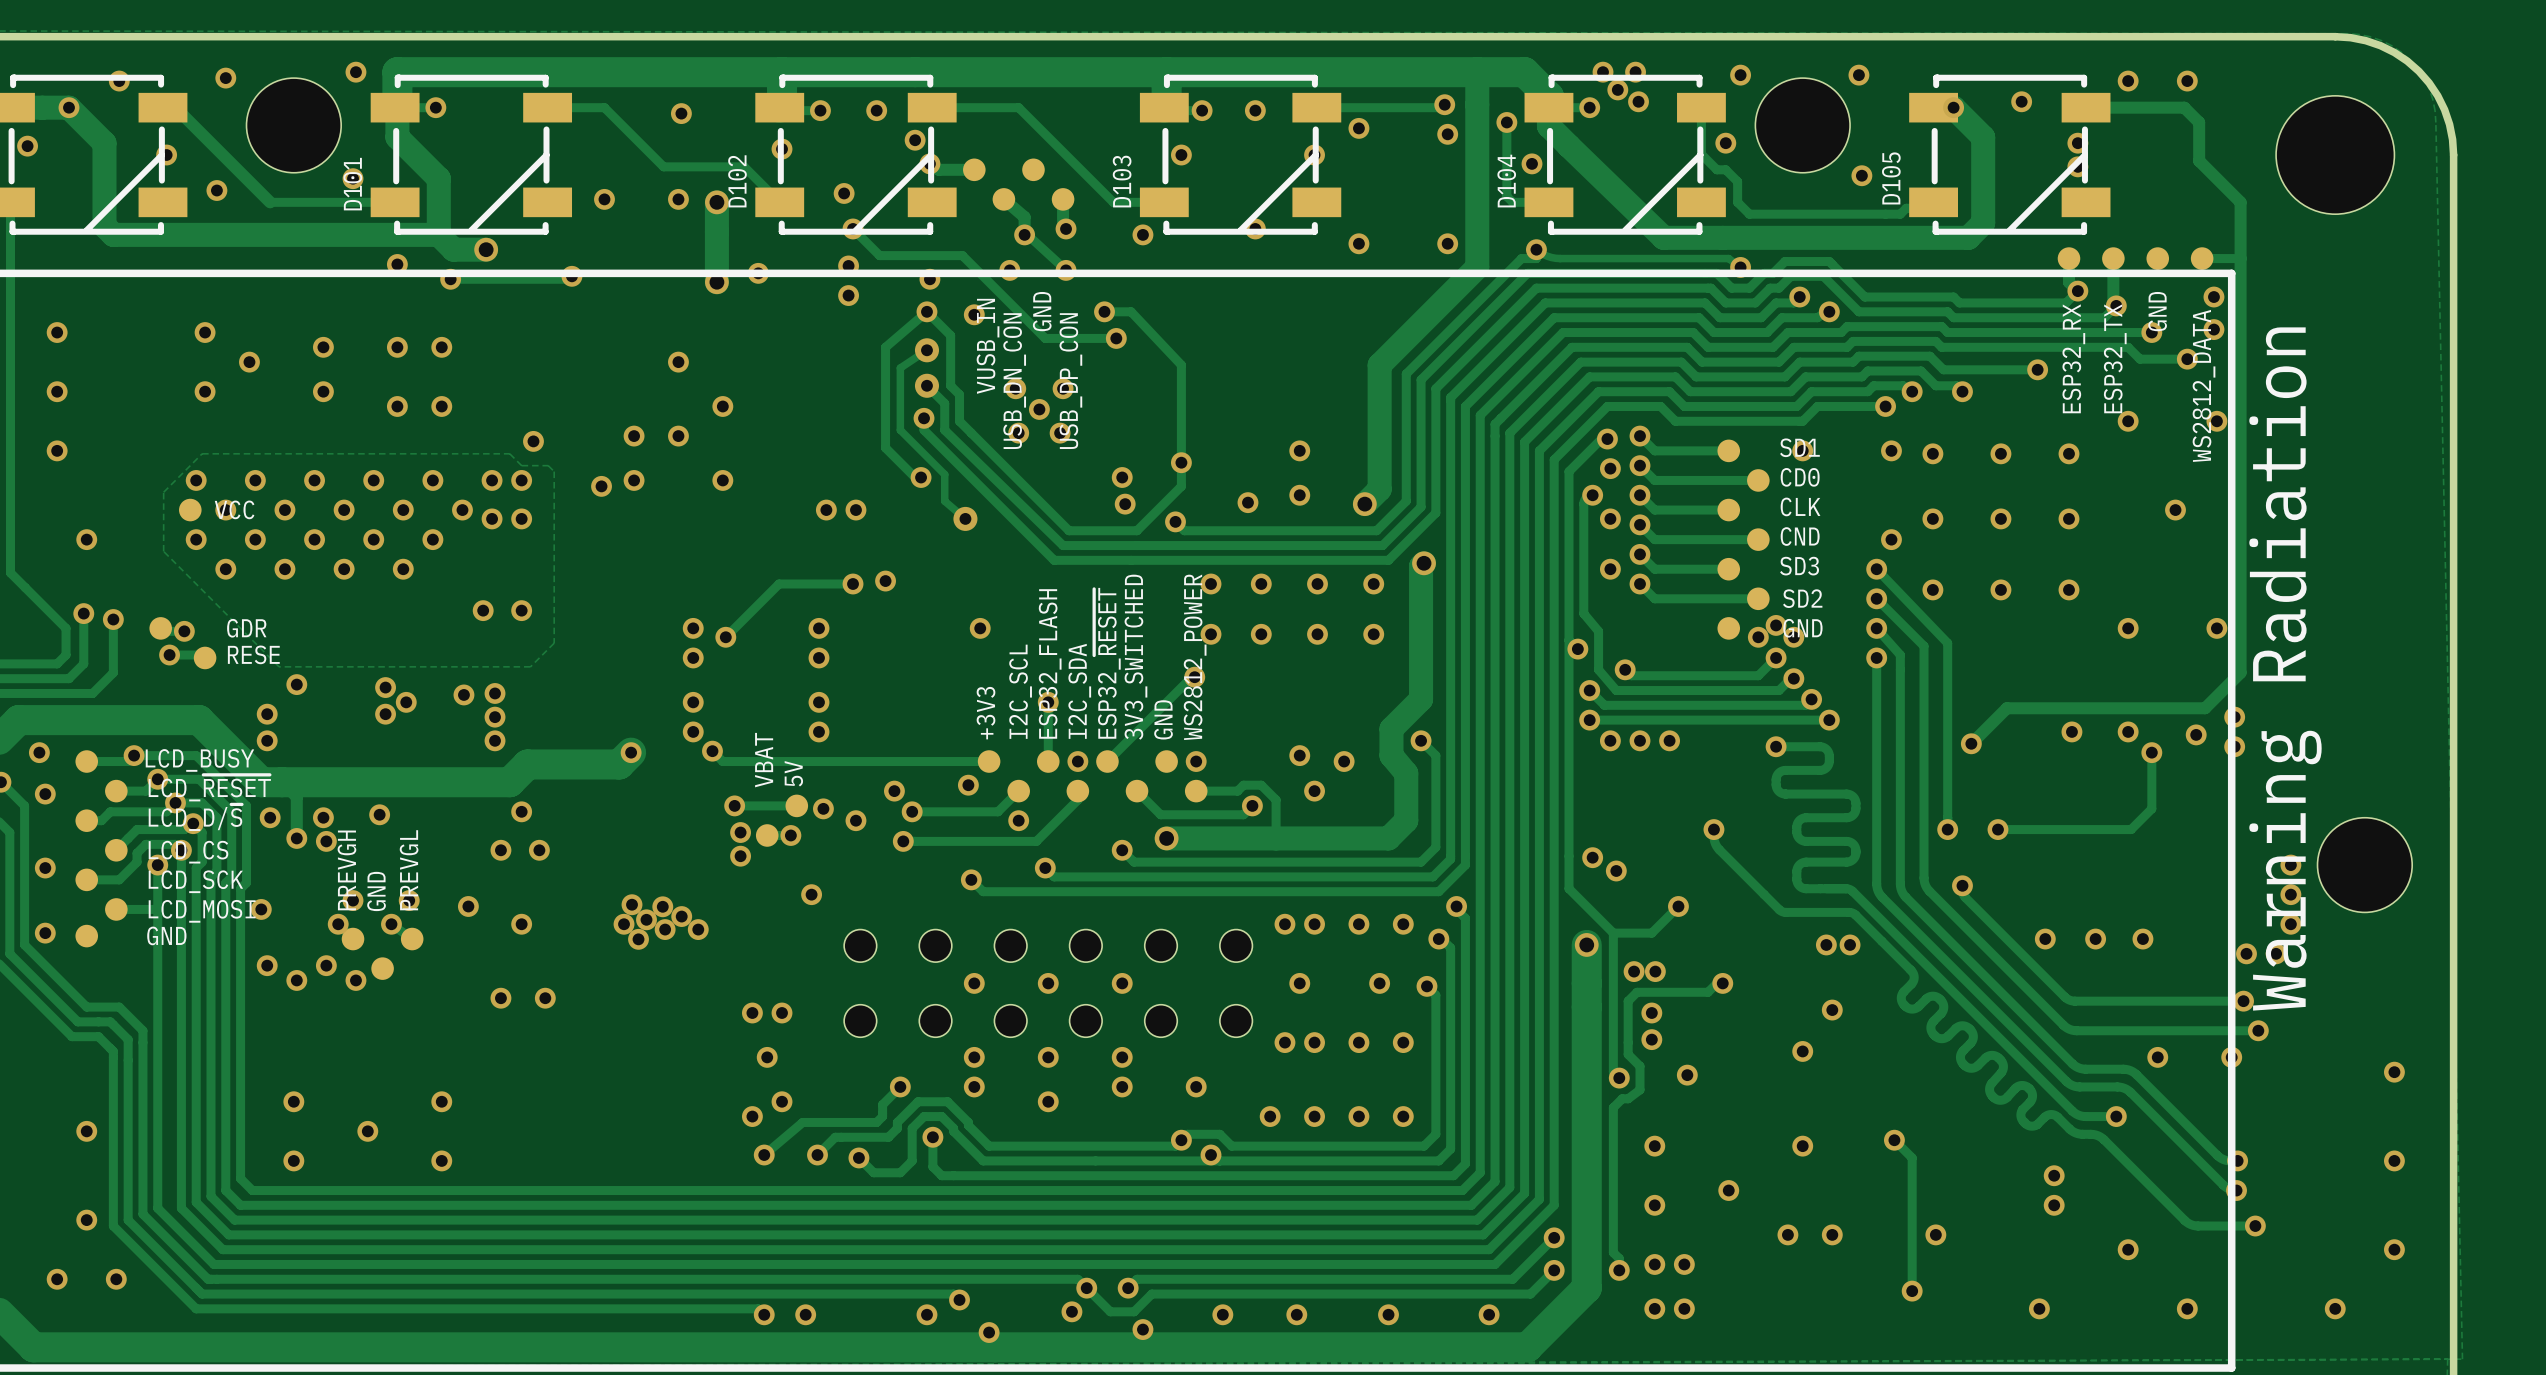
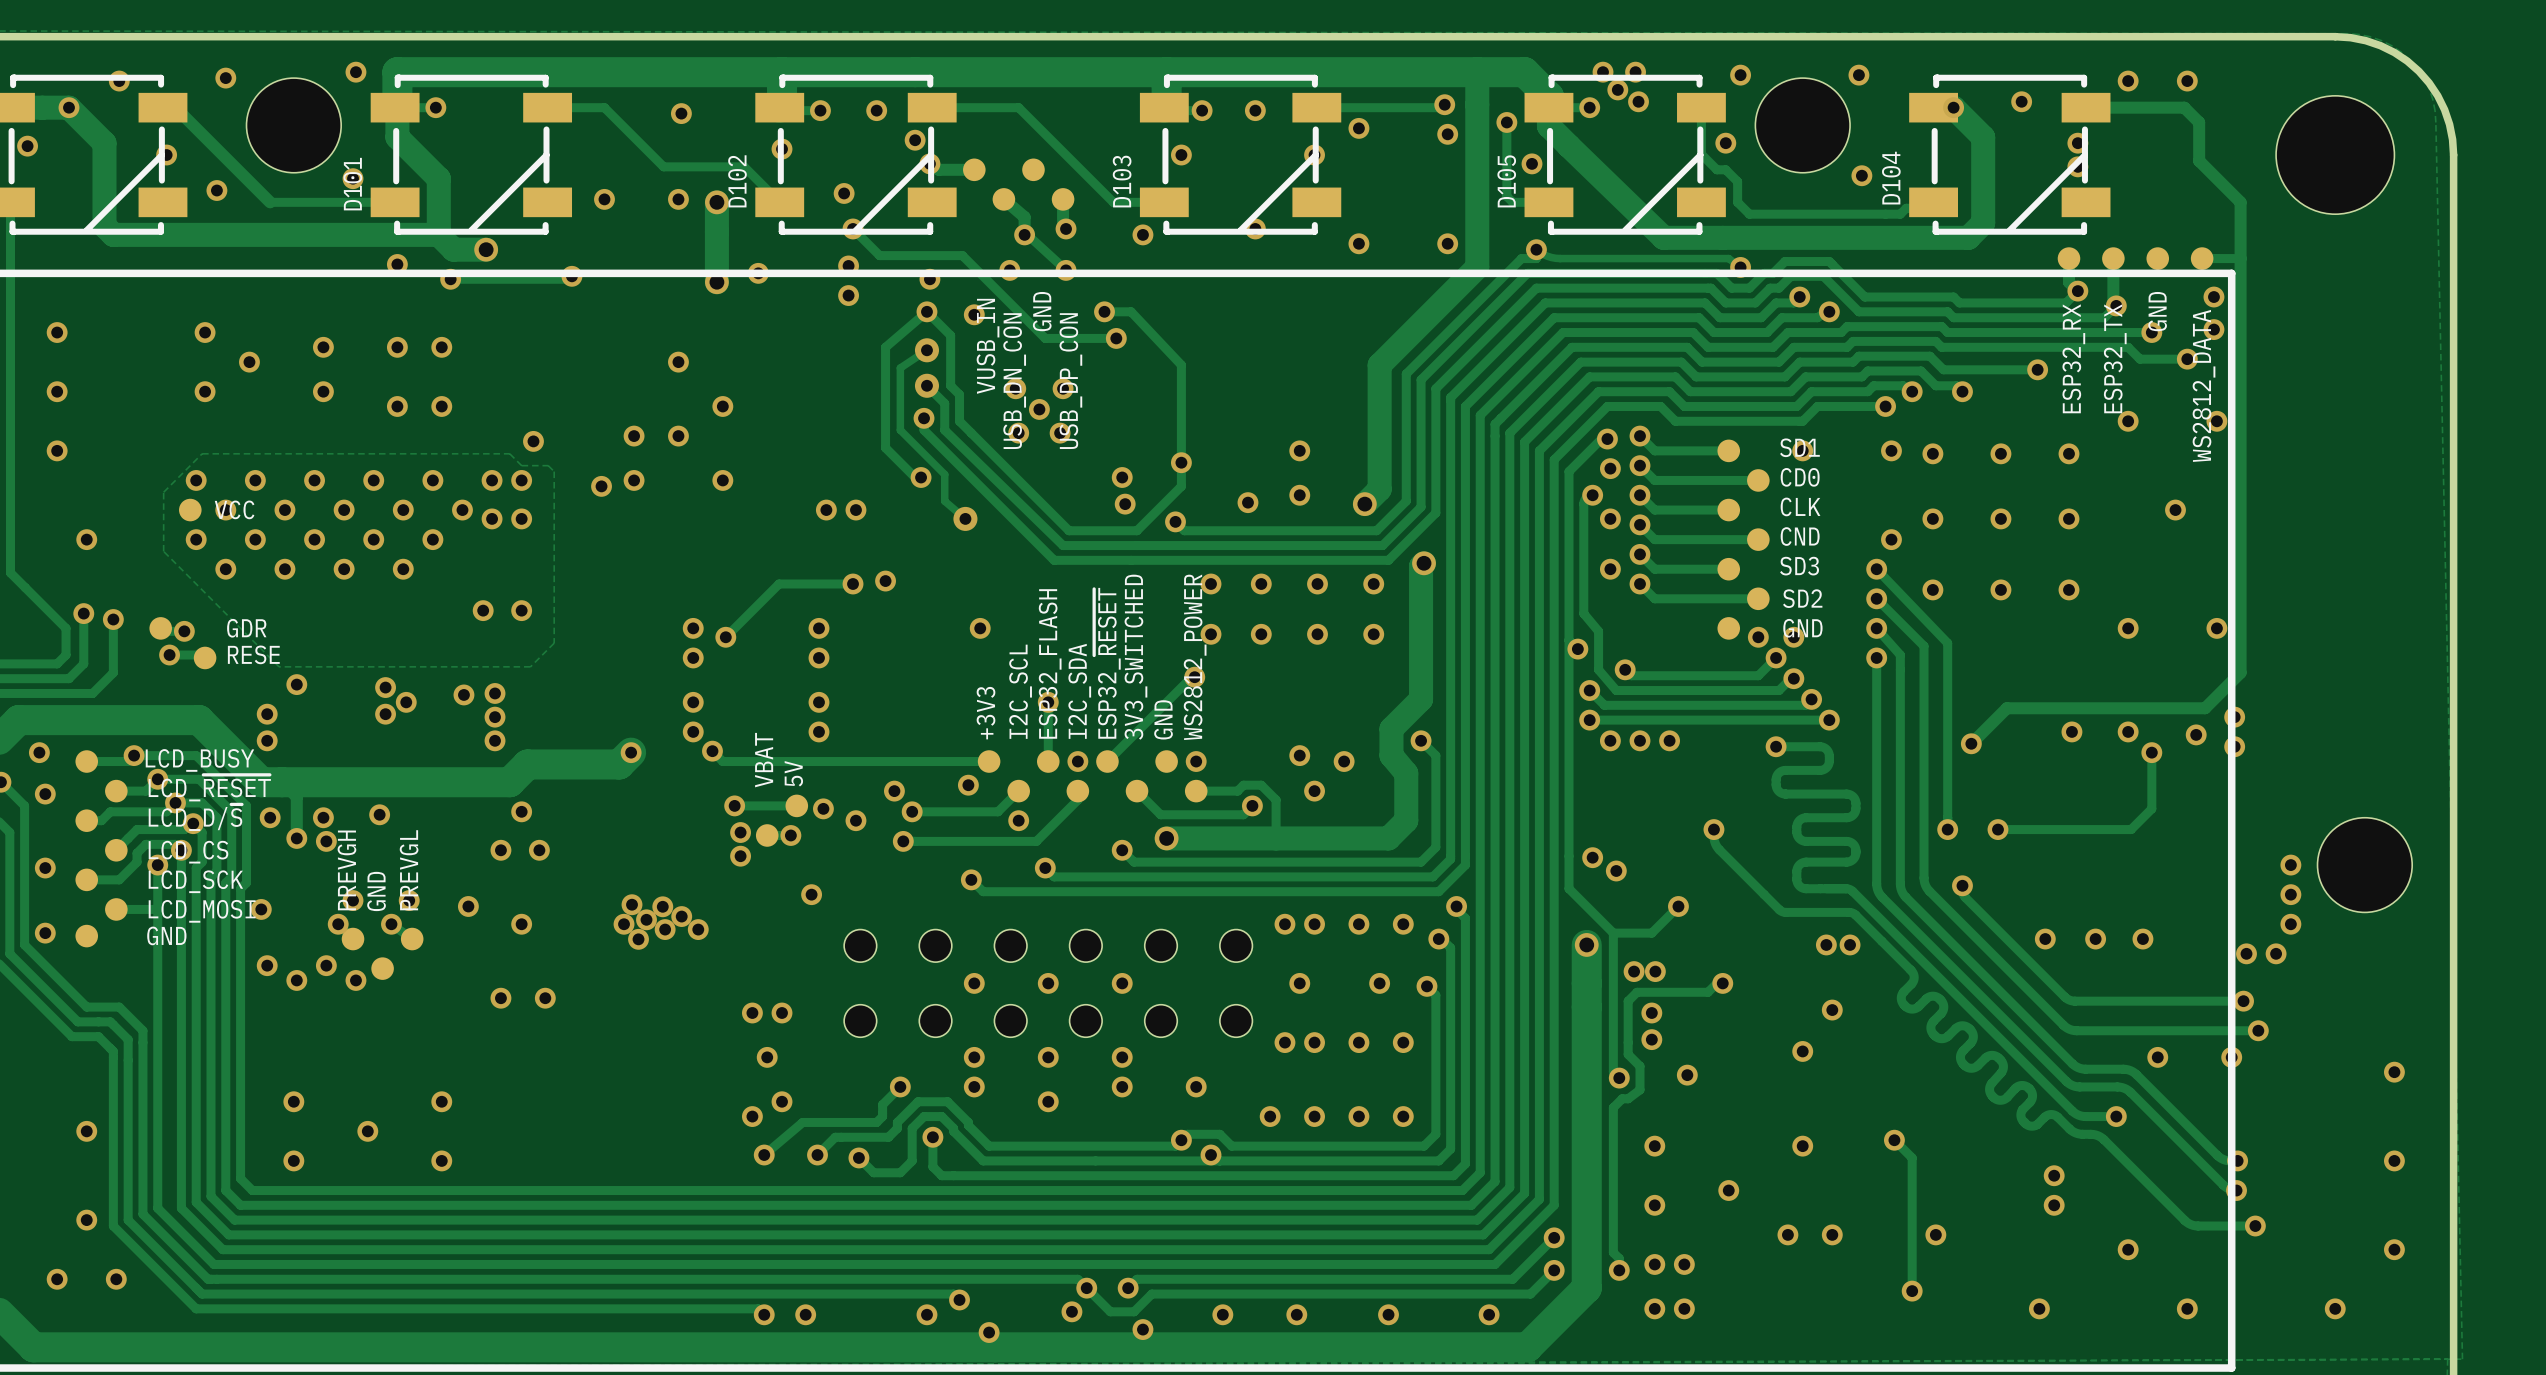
D105 name: D105 (1891, 178) -> D104 (1891, 178)
D104 name: D104 (1506, 181) -> D105 (1506, 181)
via: (1776, 625) -> none
text: Warning Radiation (2285, 669) -> none

